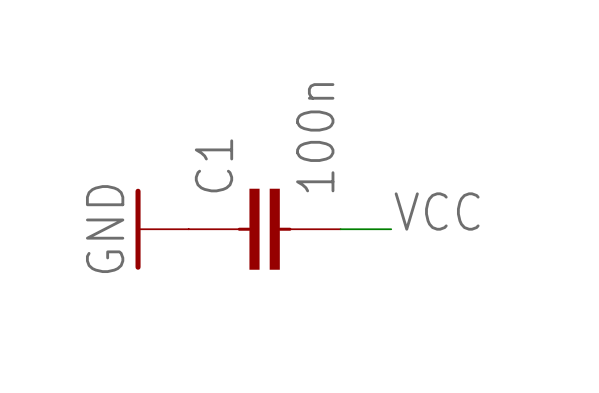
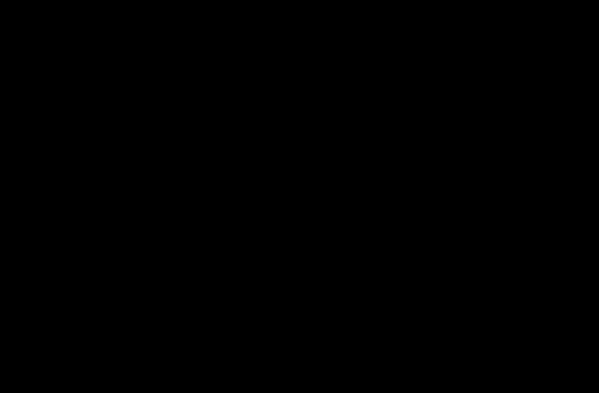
label: VCC (437, 211) -> none
power symbol: GND (162, 229) -> none
C1: 100n (264, 229) -> none
wire: (340, 229) (391, 229) -> none

